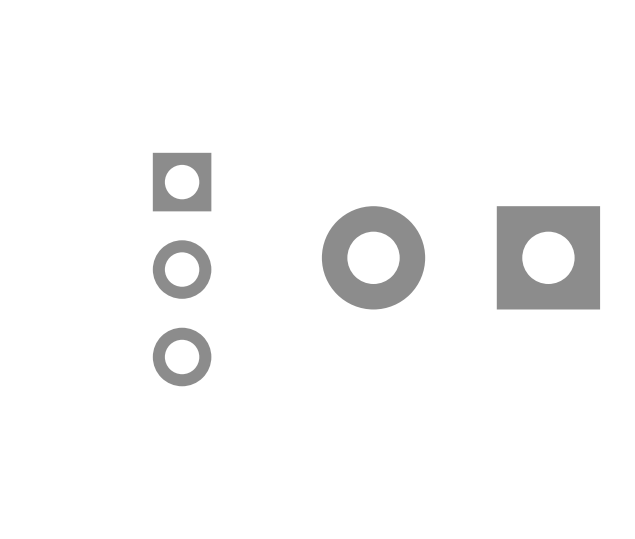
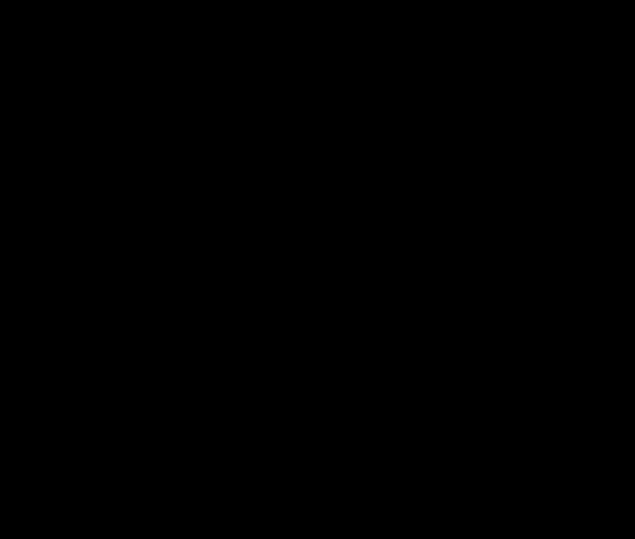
part: (460, 257) -> none
part: (182, 269) -> none

